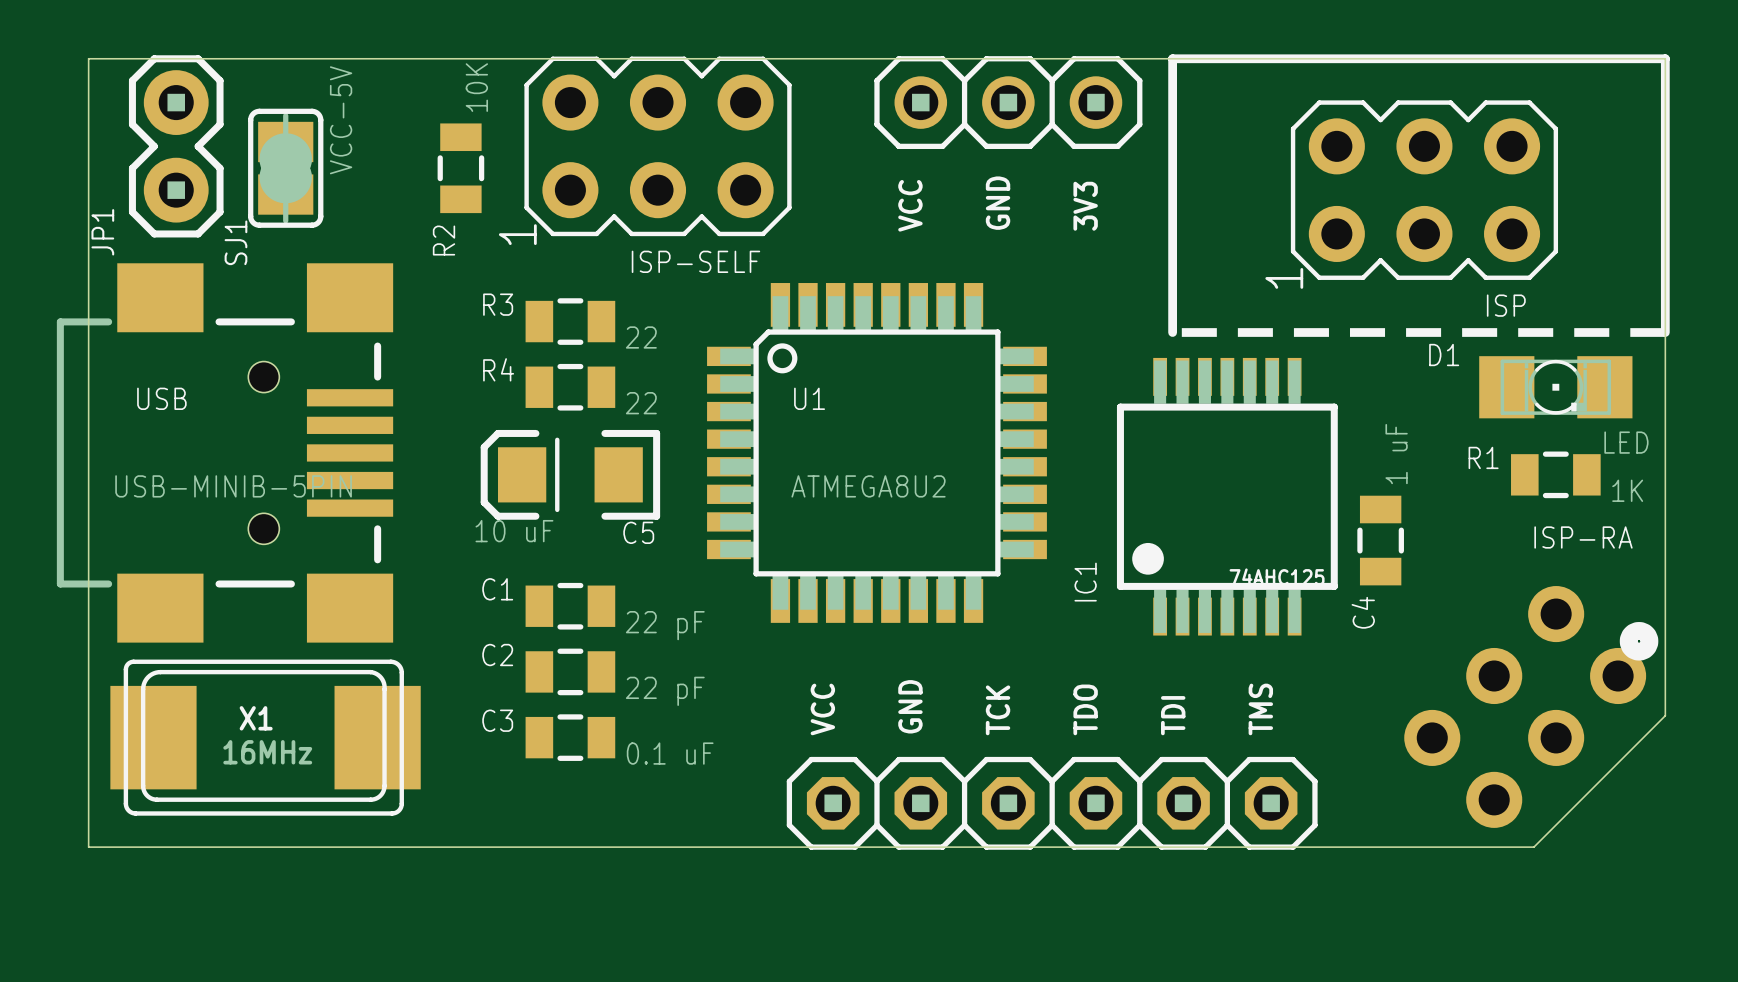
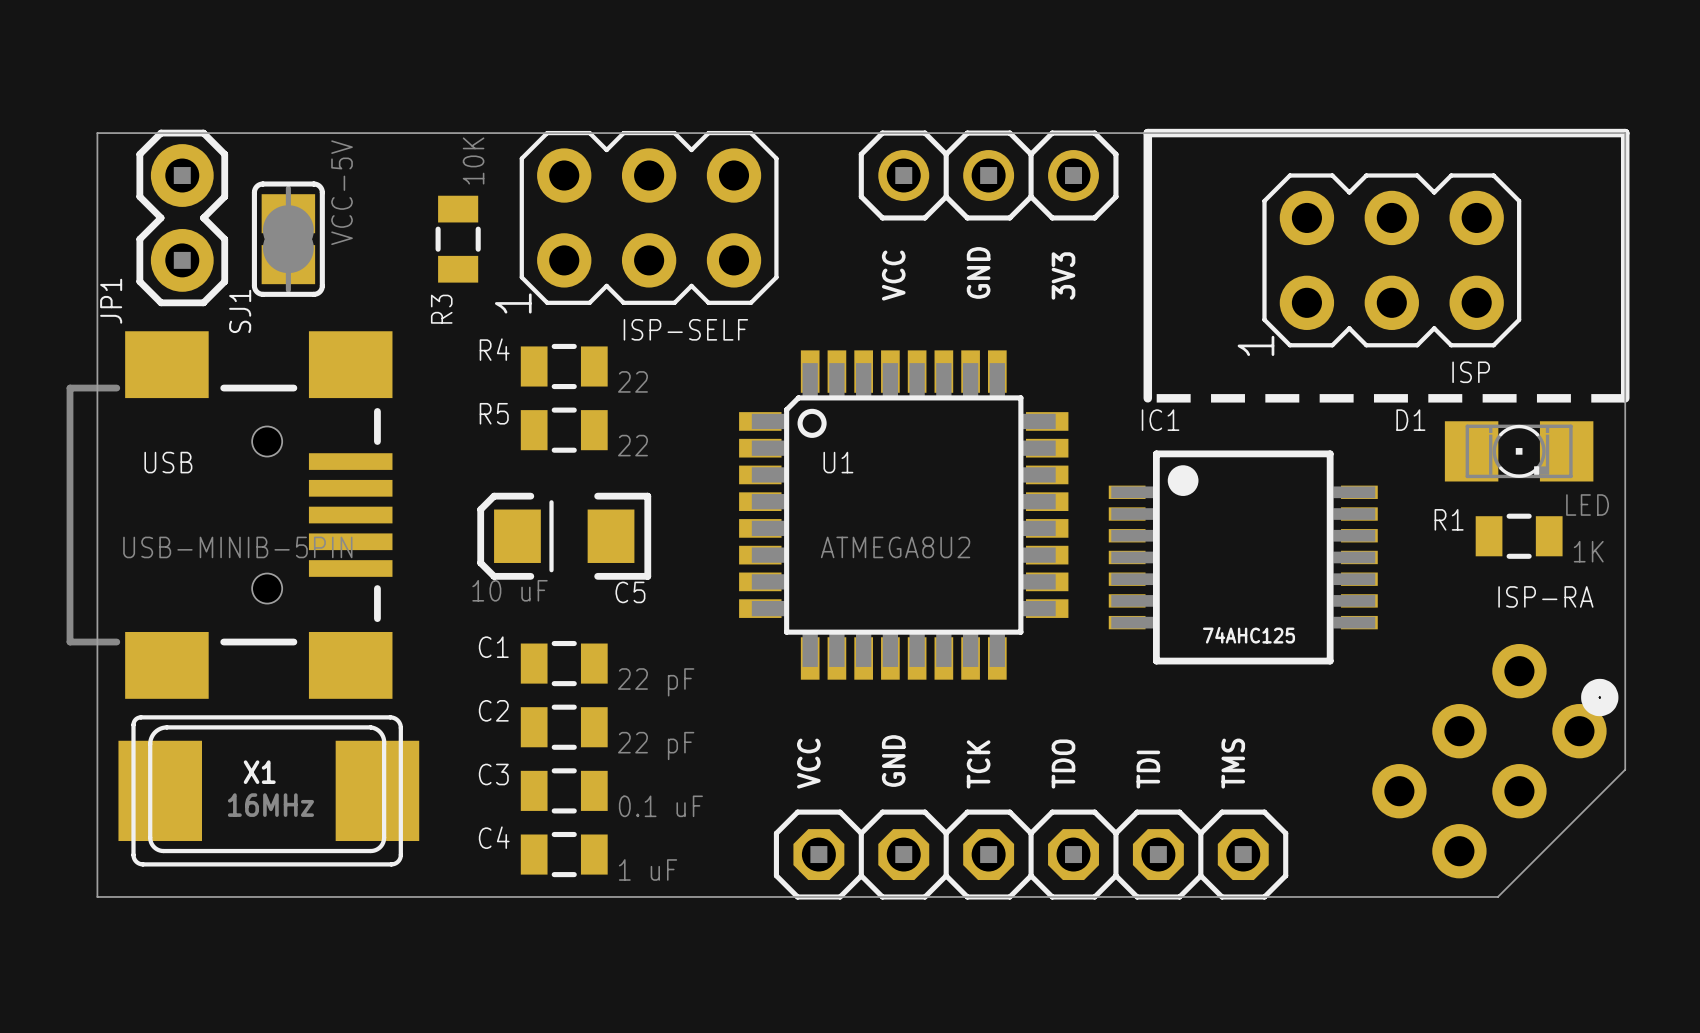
R2 name: R2 (444, 240) -> R3 (441, 309)
R3: 22 (570, 321) -> none
R5: none -> 22 (564, 430)
R4 position: (570, 387) -> (564, 366)
U1 position: (876, 452) -> (903, 515)
IC1 rotation: 0° (1227, 496) -> 90° clockwise (1243, 557)
C4 rotation: 0° (1380, 540) -> 90° clockwise (564, 854)
C4 position: (1380, 540) -> (564, 854)

